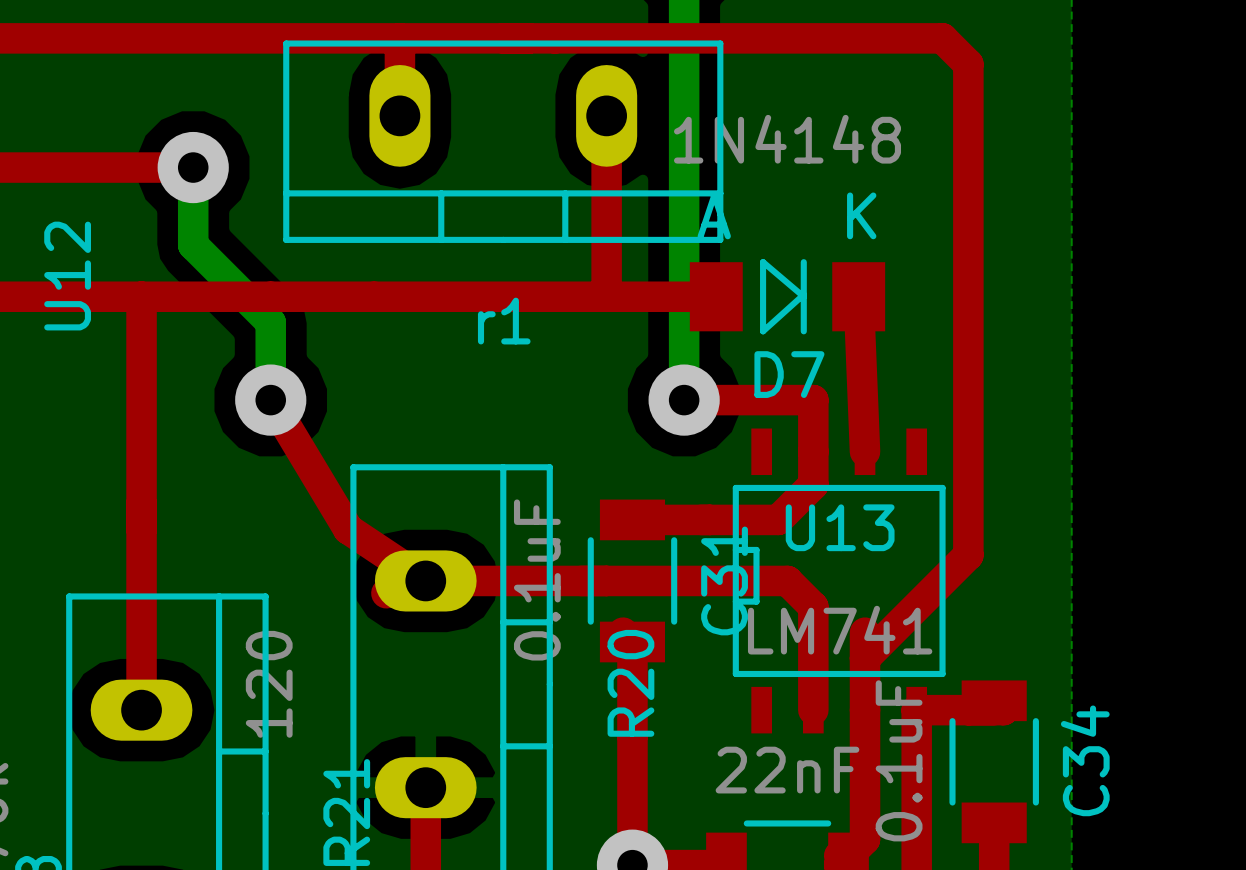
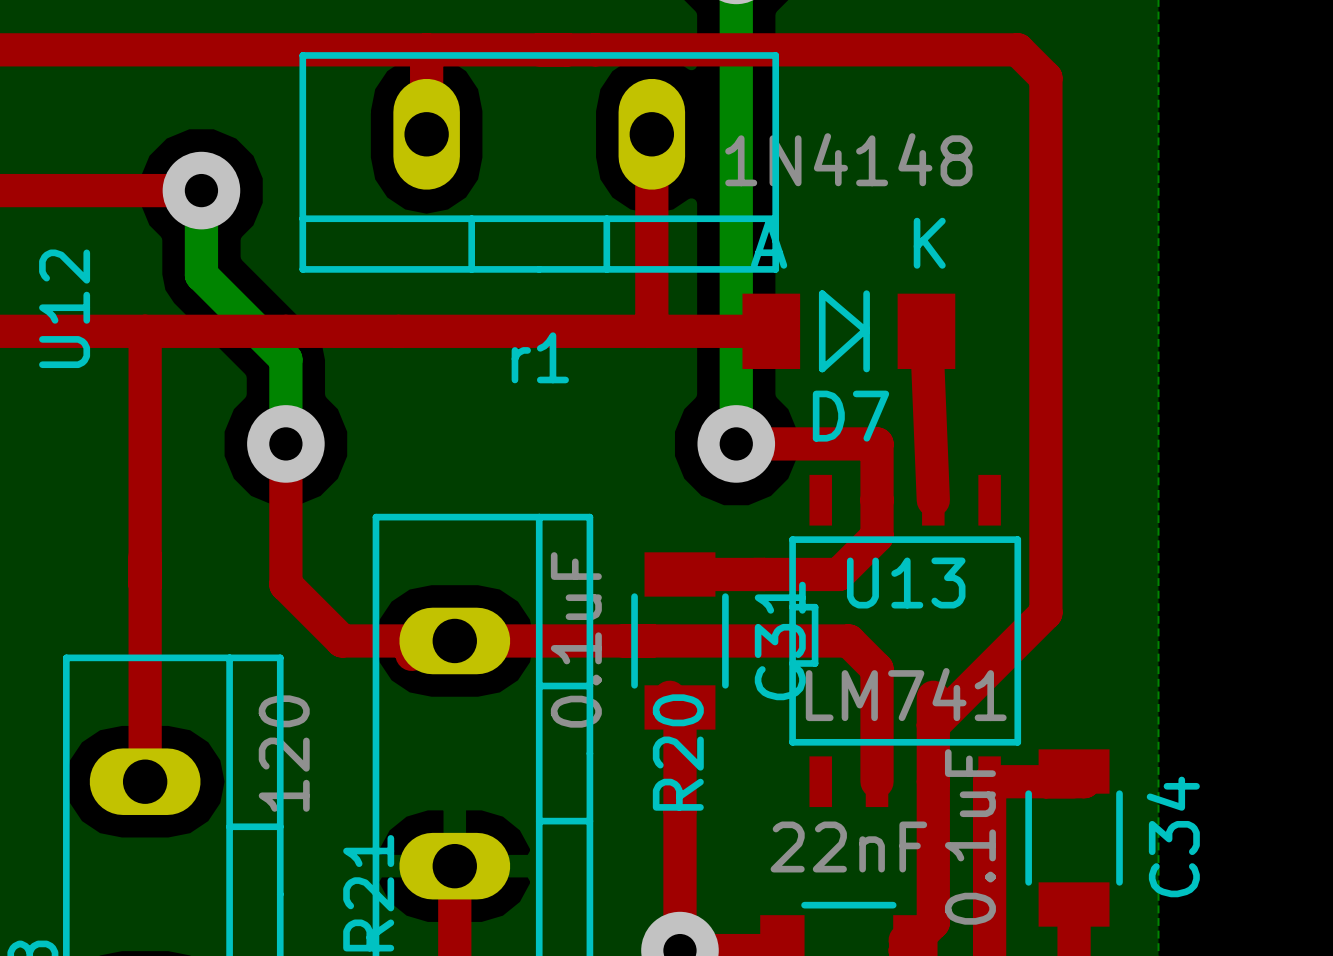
top track: (270, 400) (348, 529) (425, 580) -> (285, 443) (285, 584) (342, 640) (454, 640)

